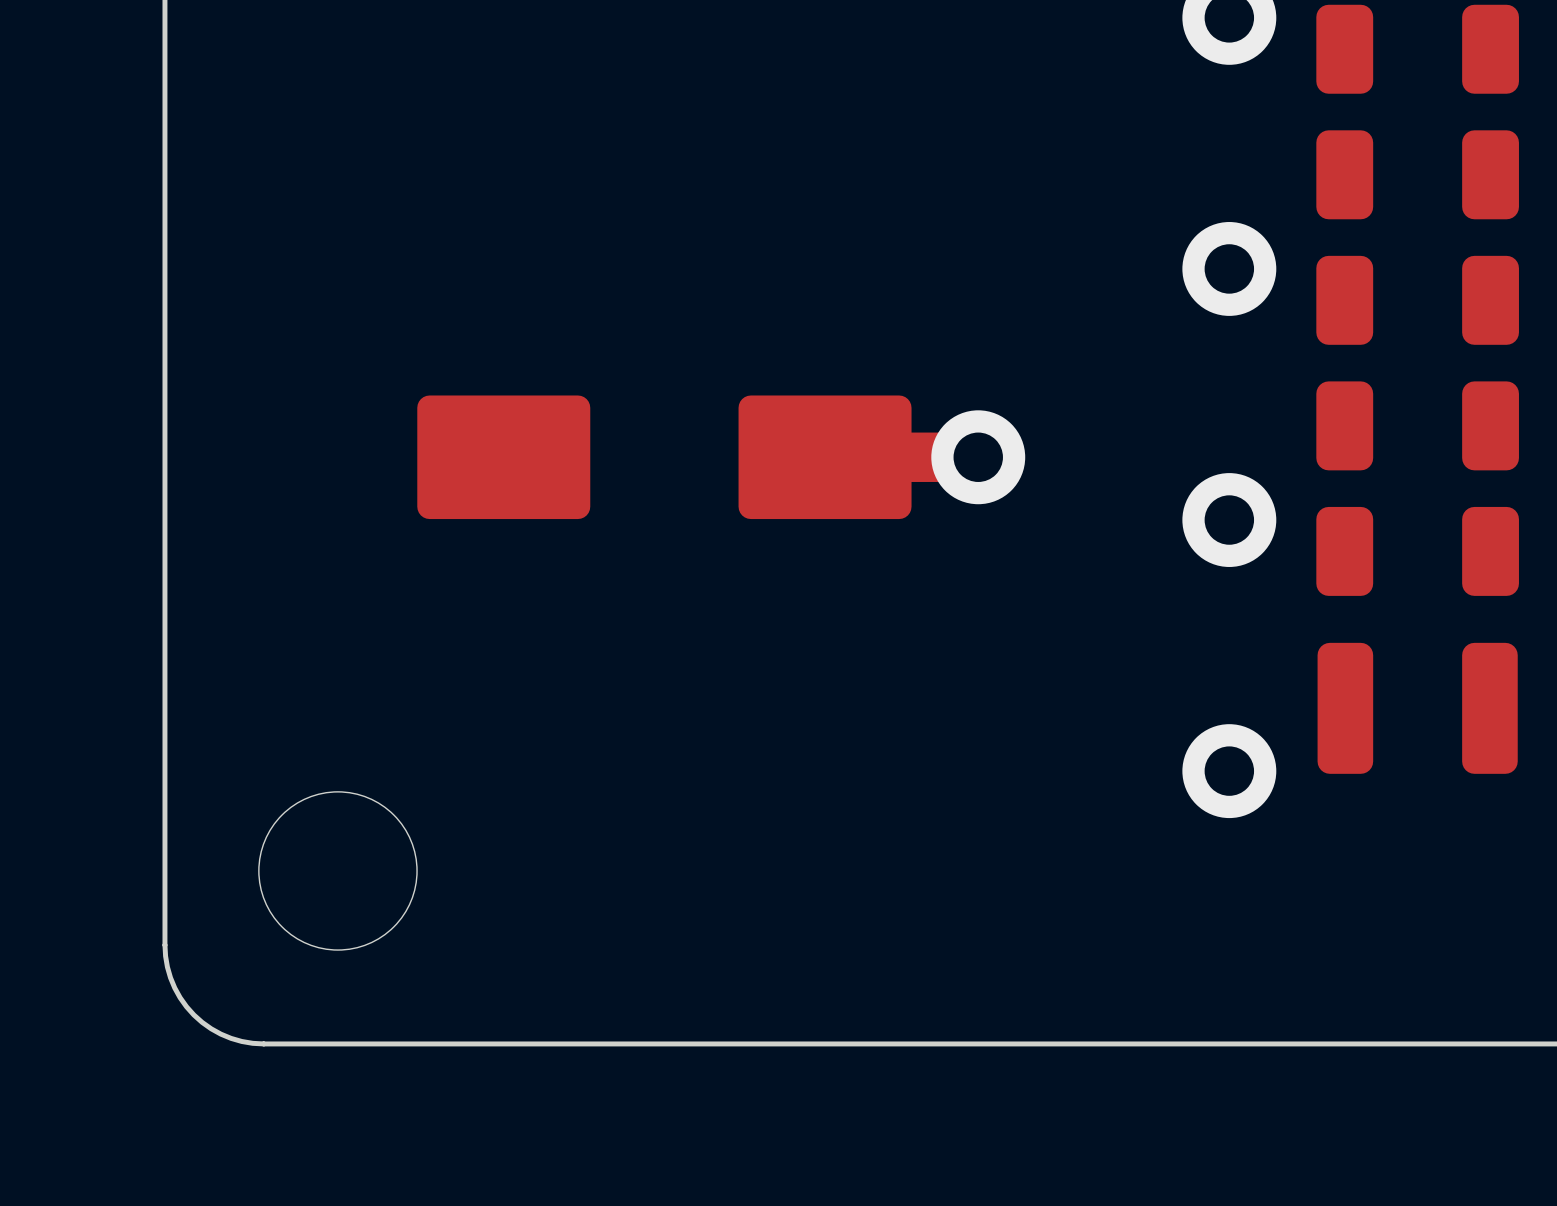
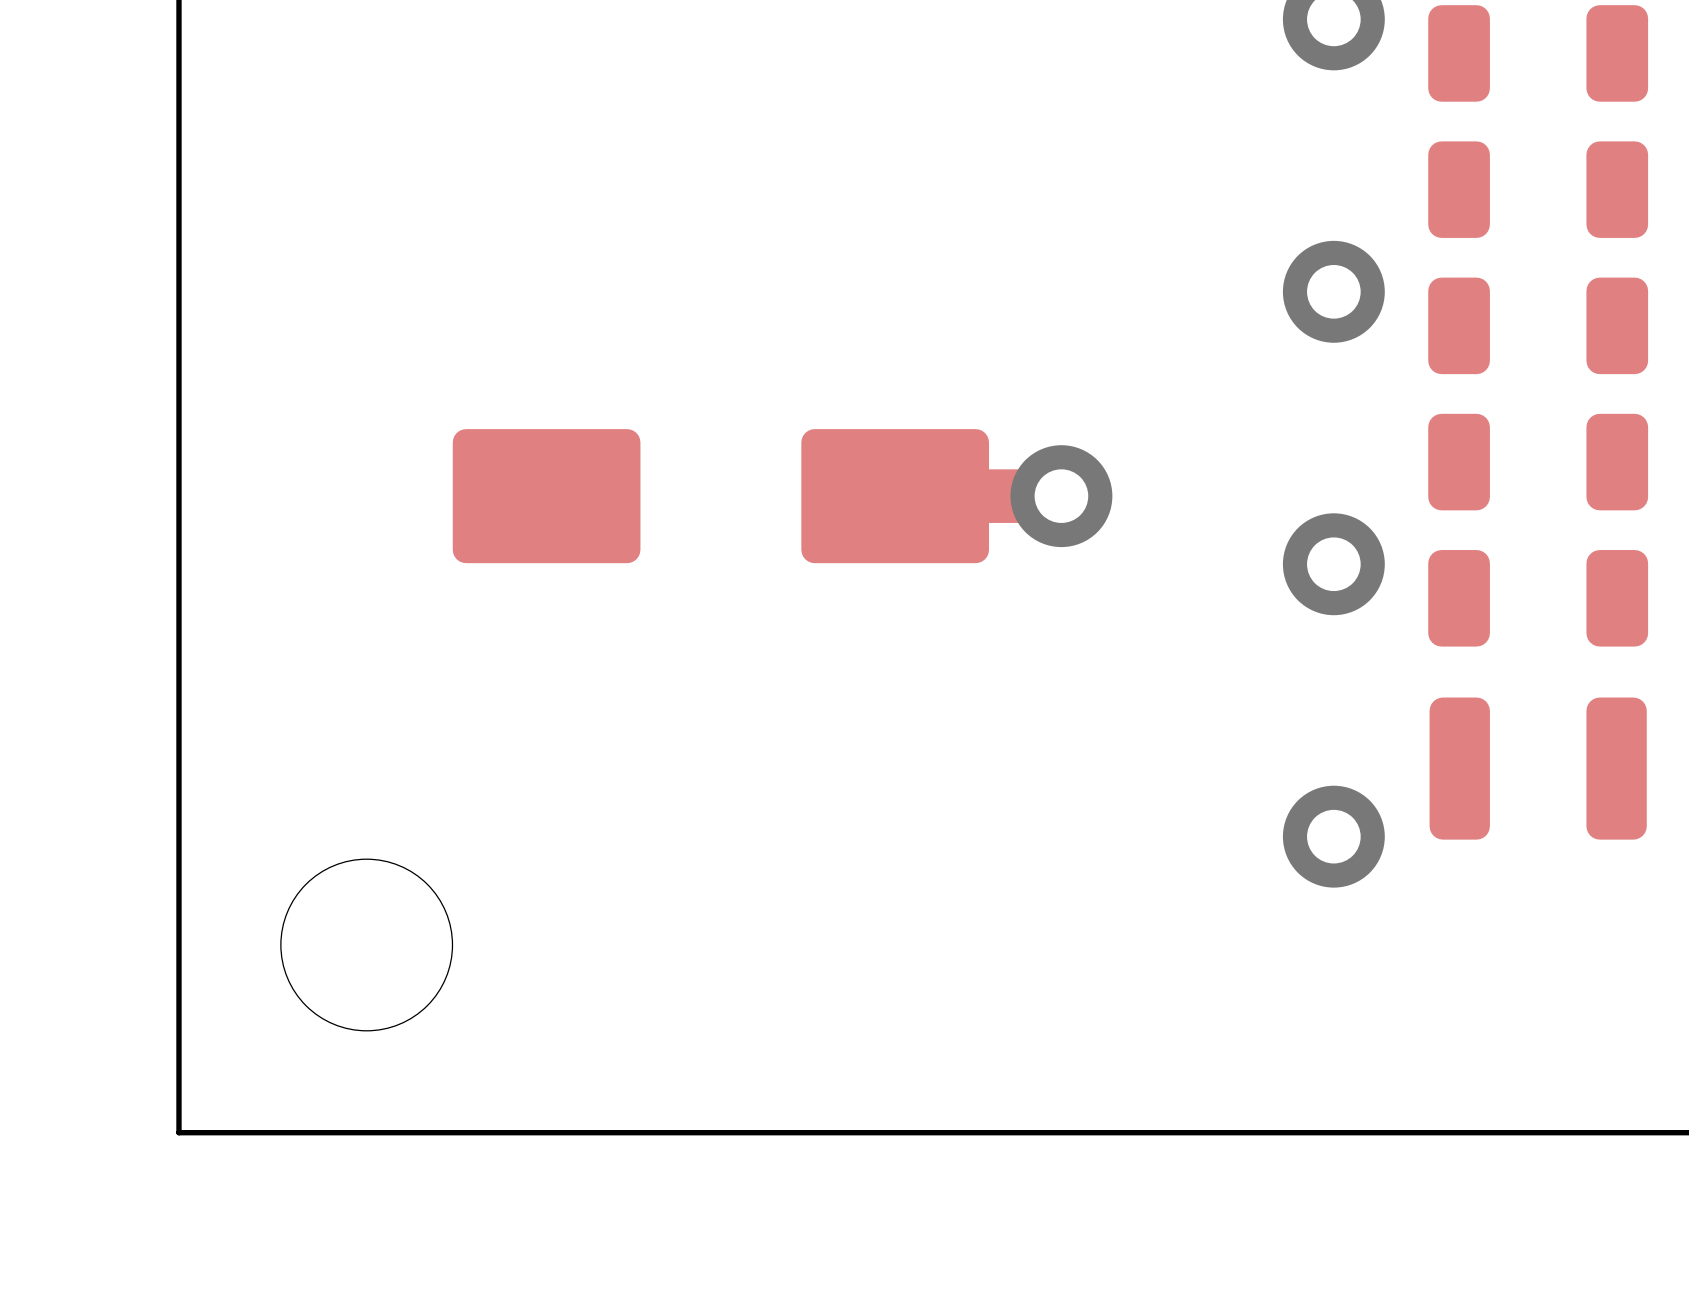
board edge: (164, 945) (170, 977) (180, 997) (193, 1014) (211, 1028) (231, 1038) (263, 1043) -> (178, 1025) (178, 1132) (286, 1132)

